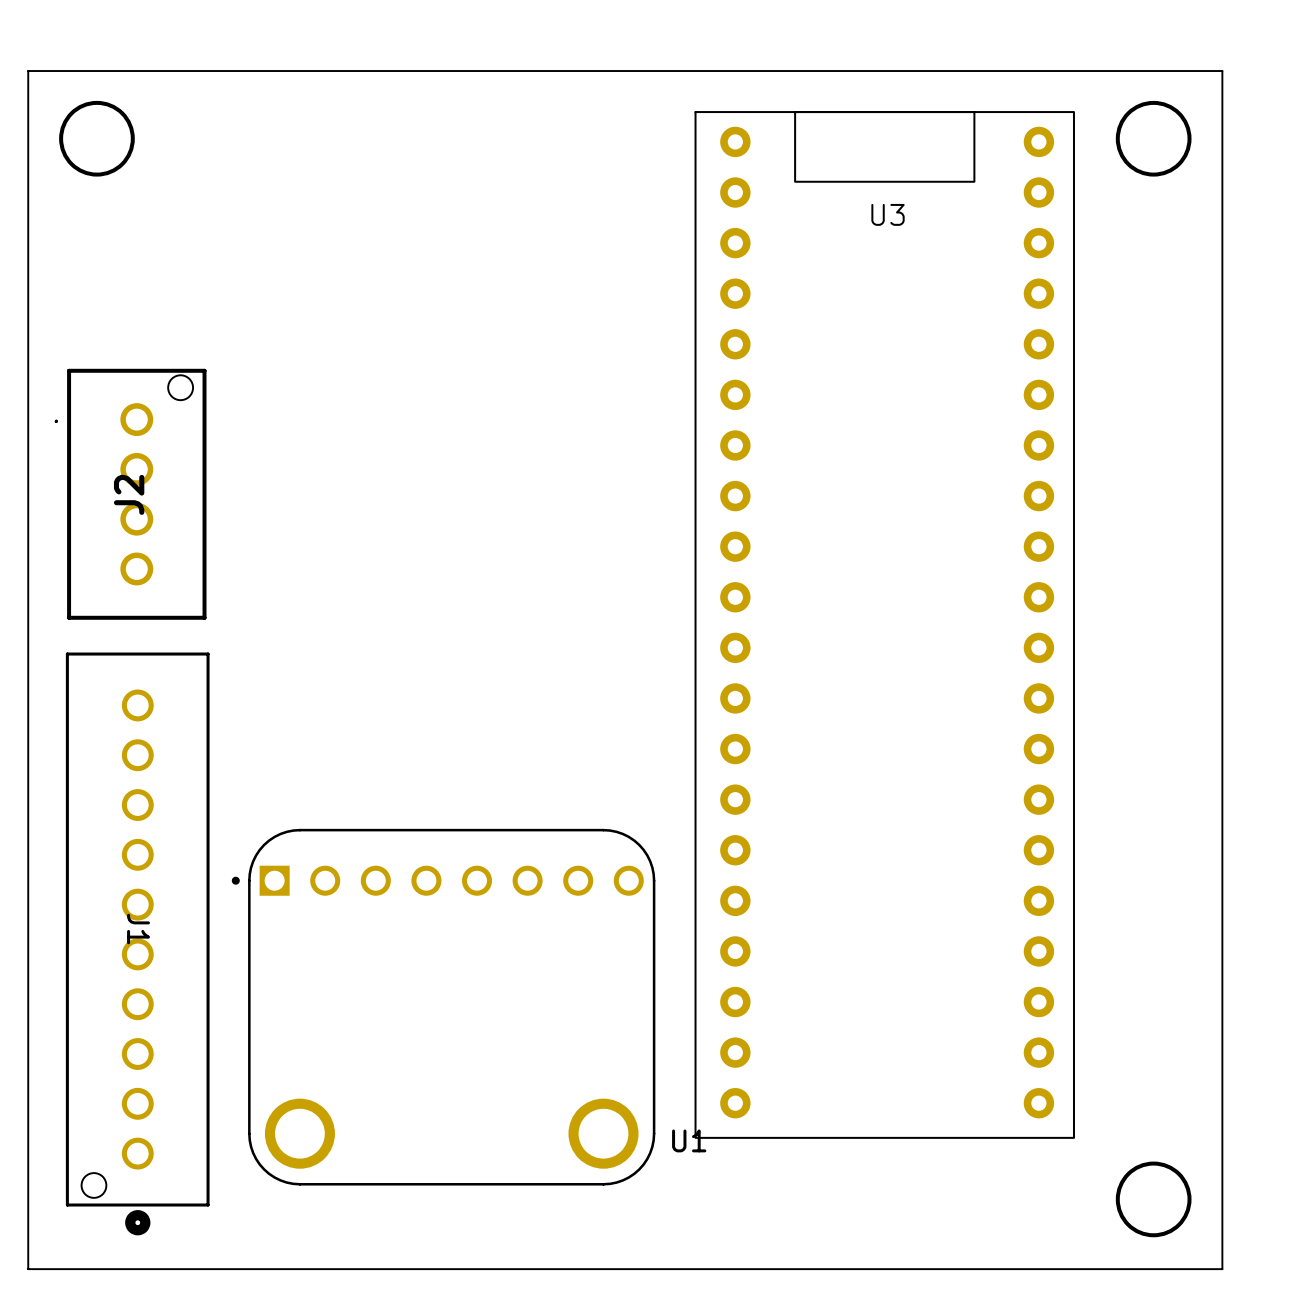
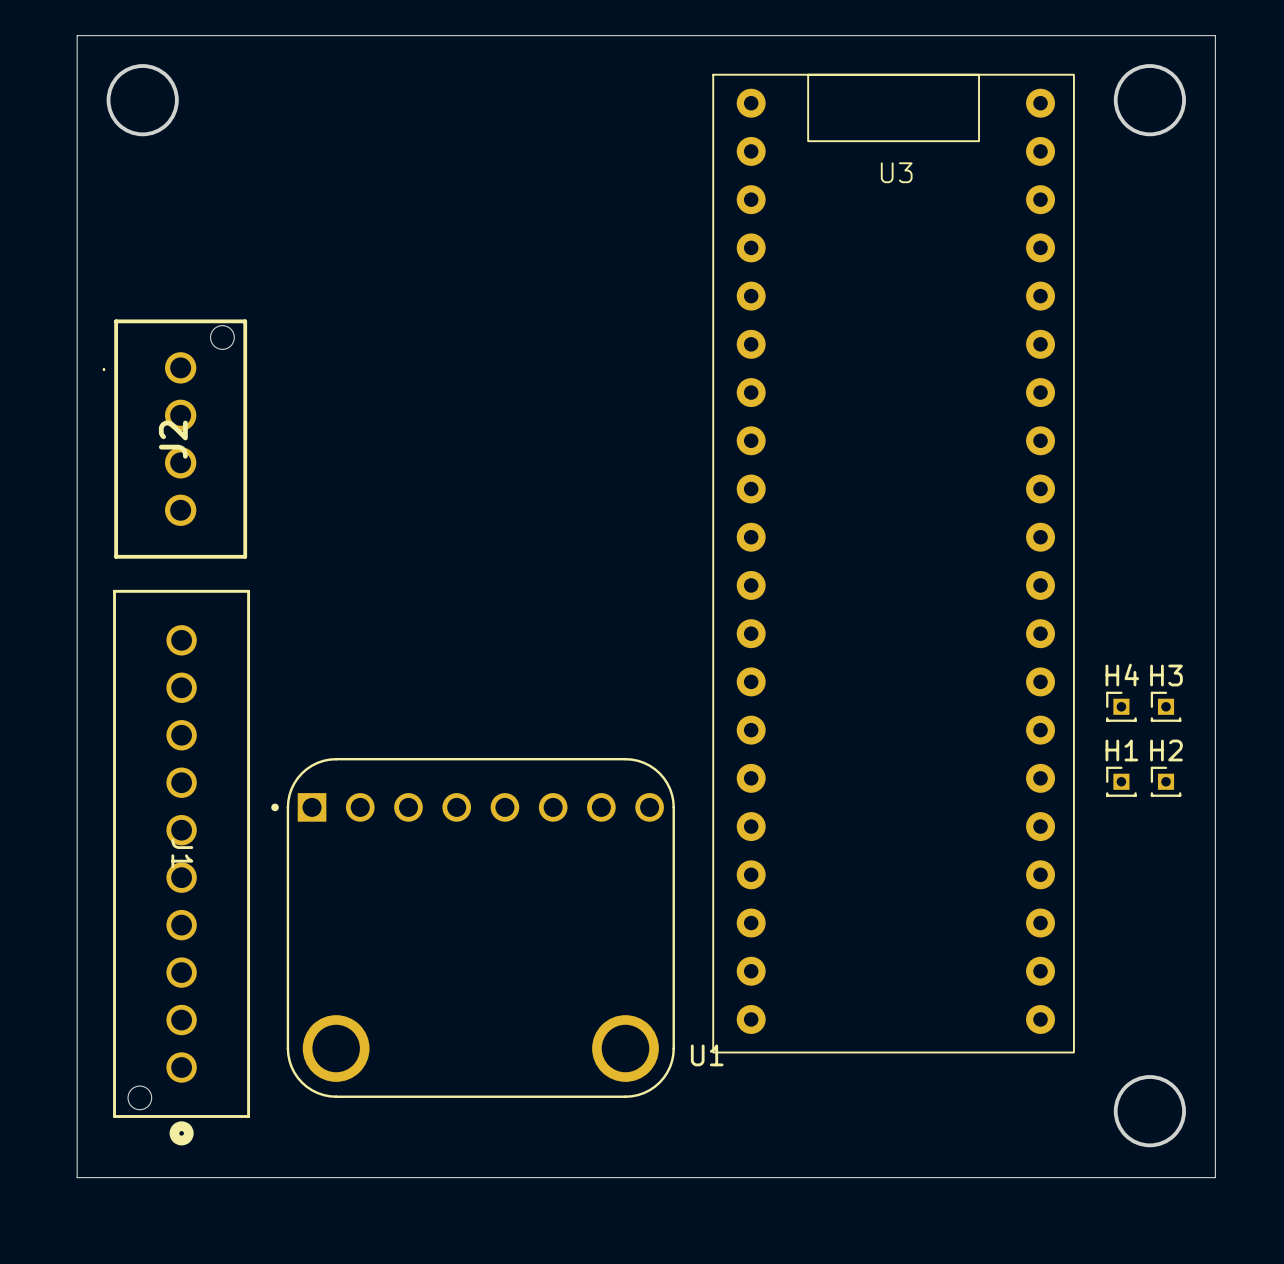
H4: none -> (1121, 706)
H3: none -> (1166, 706)
H1: none -> (1121, 781)
H2: none -> (1166, 781)

